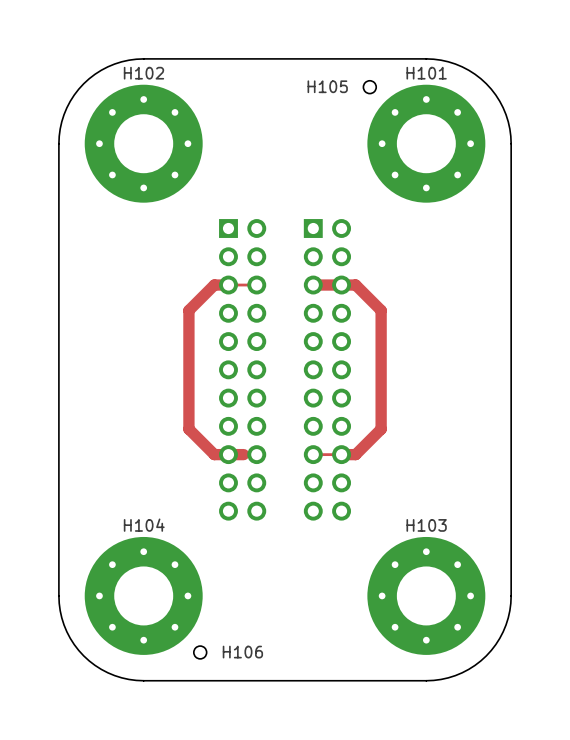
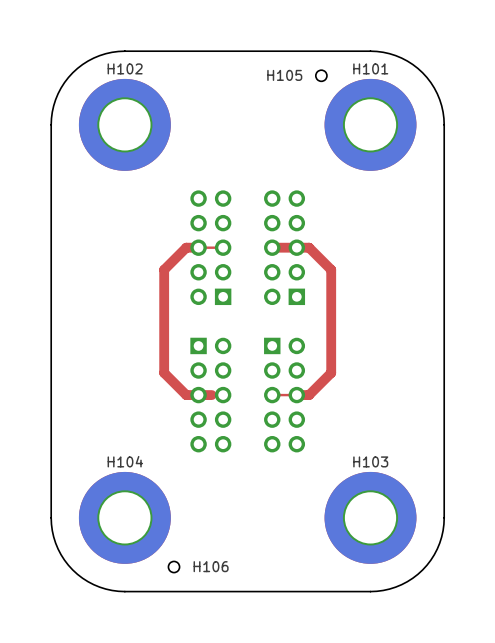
H102 footprint: [84, 84, 203, 203] -> [78, 78, 171, 171]
H101 footprint: [367, 84, 486, 203] -> [324, 78, 417, 171]
part: none -> (210, 247)
part: none -> (284, 247)
part: (242, 369) -> none
part: (327, 369) -> none
part: none -> (210, 395)
part: none -> (284, 395)
H104 footprint: [84, 536, 203, 655] -> [78, 471, 171, 564]
H103 footprint: [367, 536, 486, 655] -> [324, 471, 417, 564]

